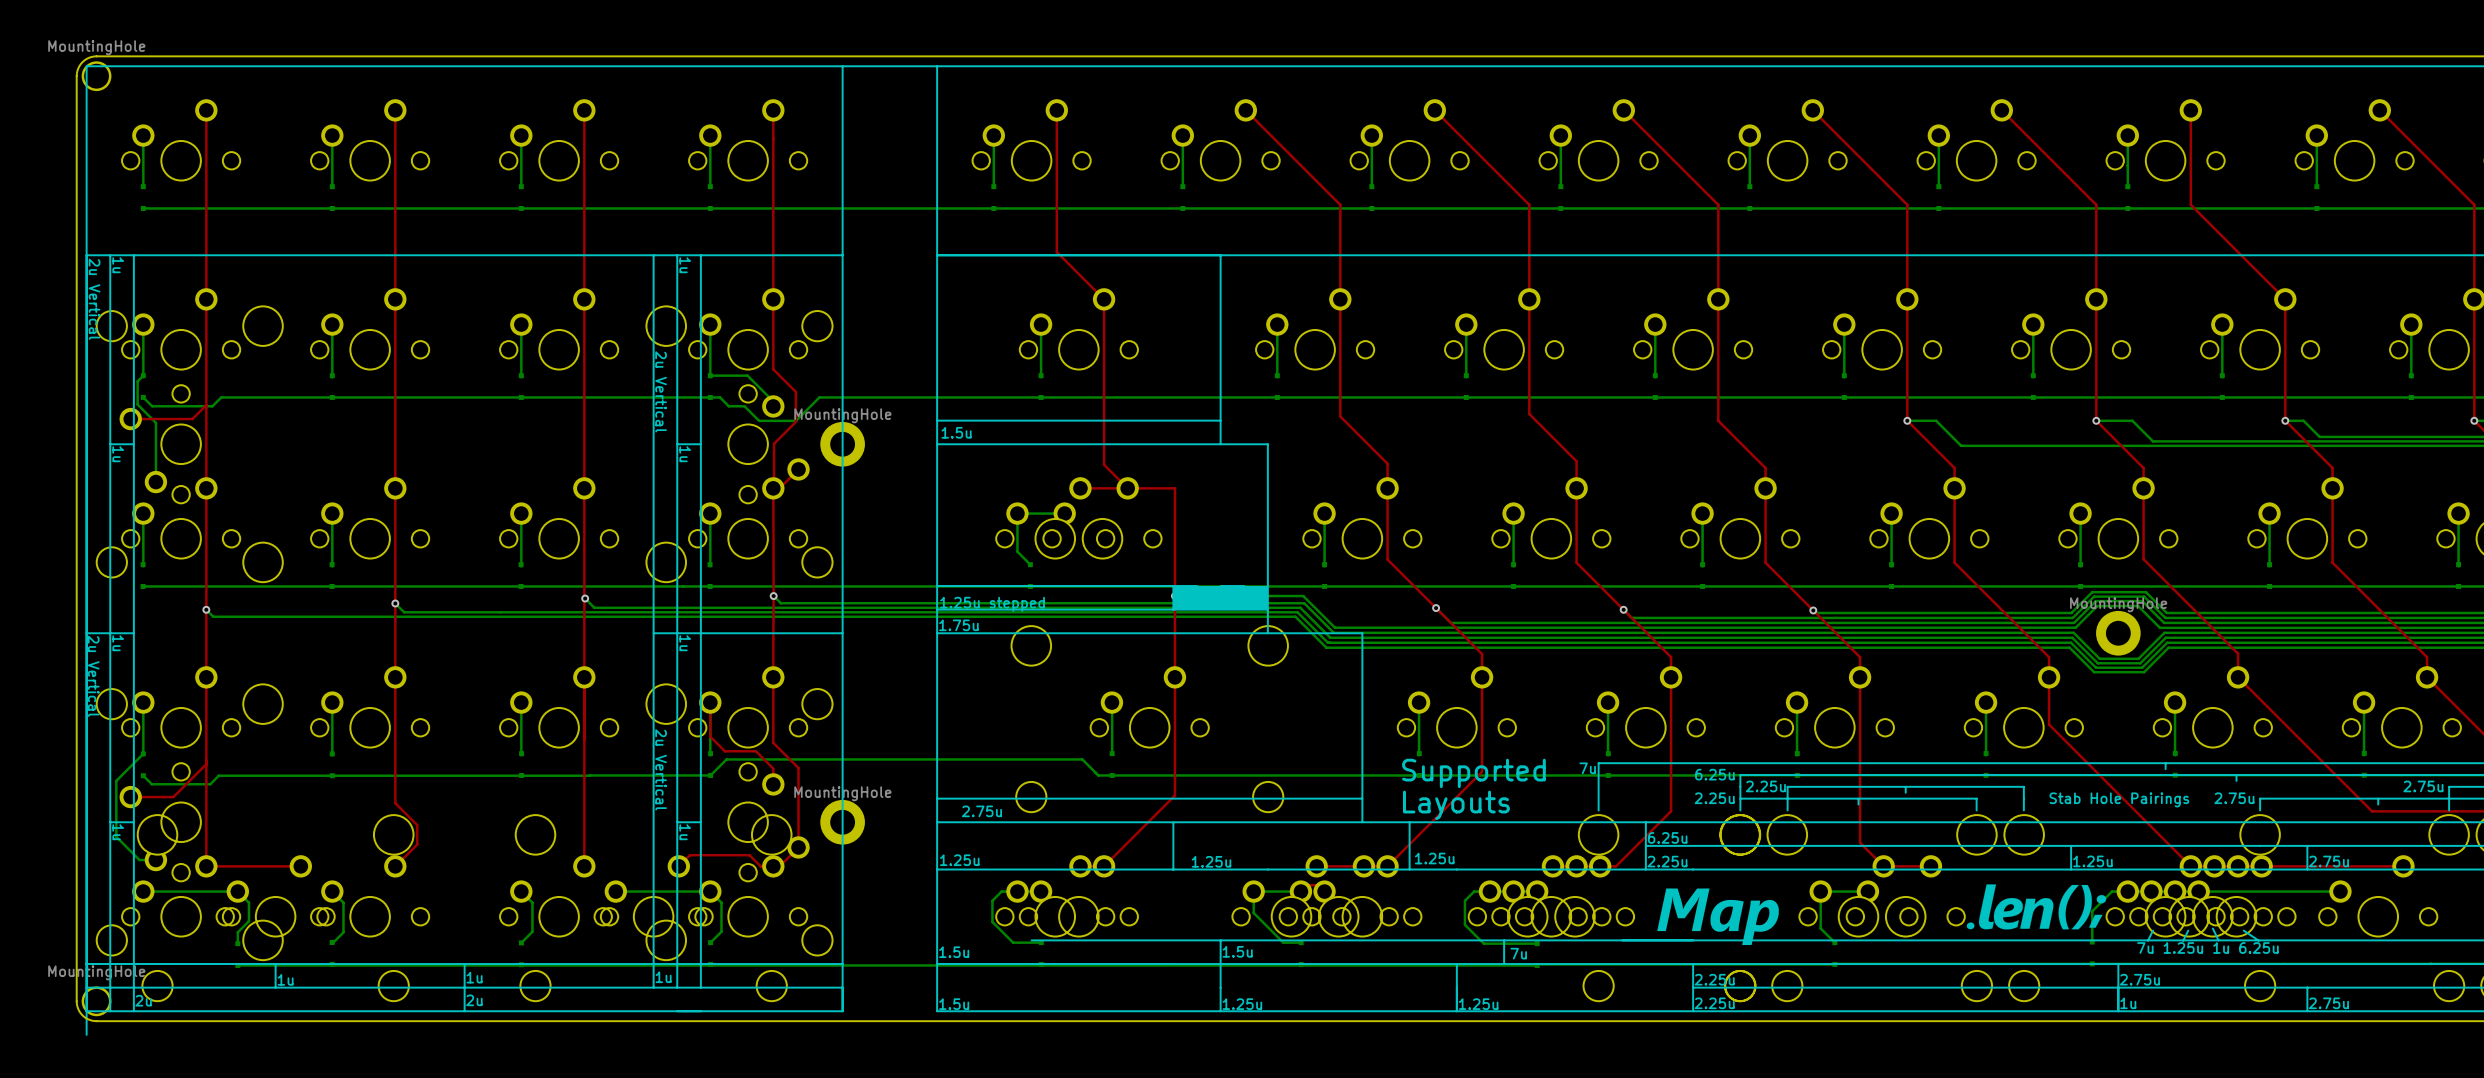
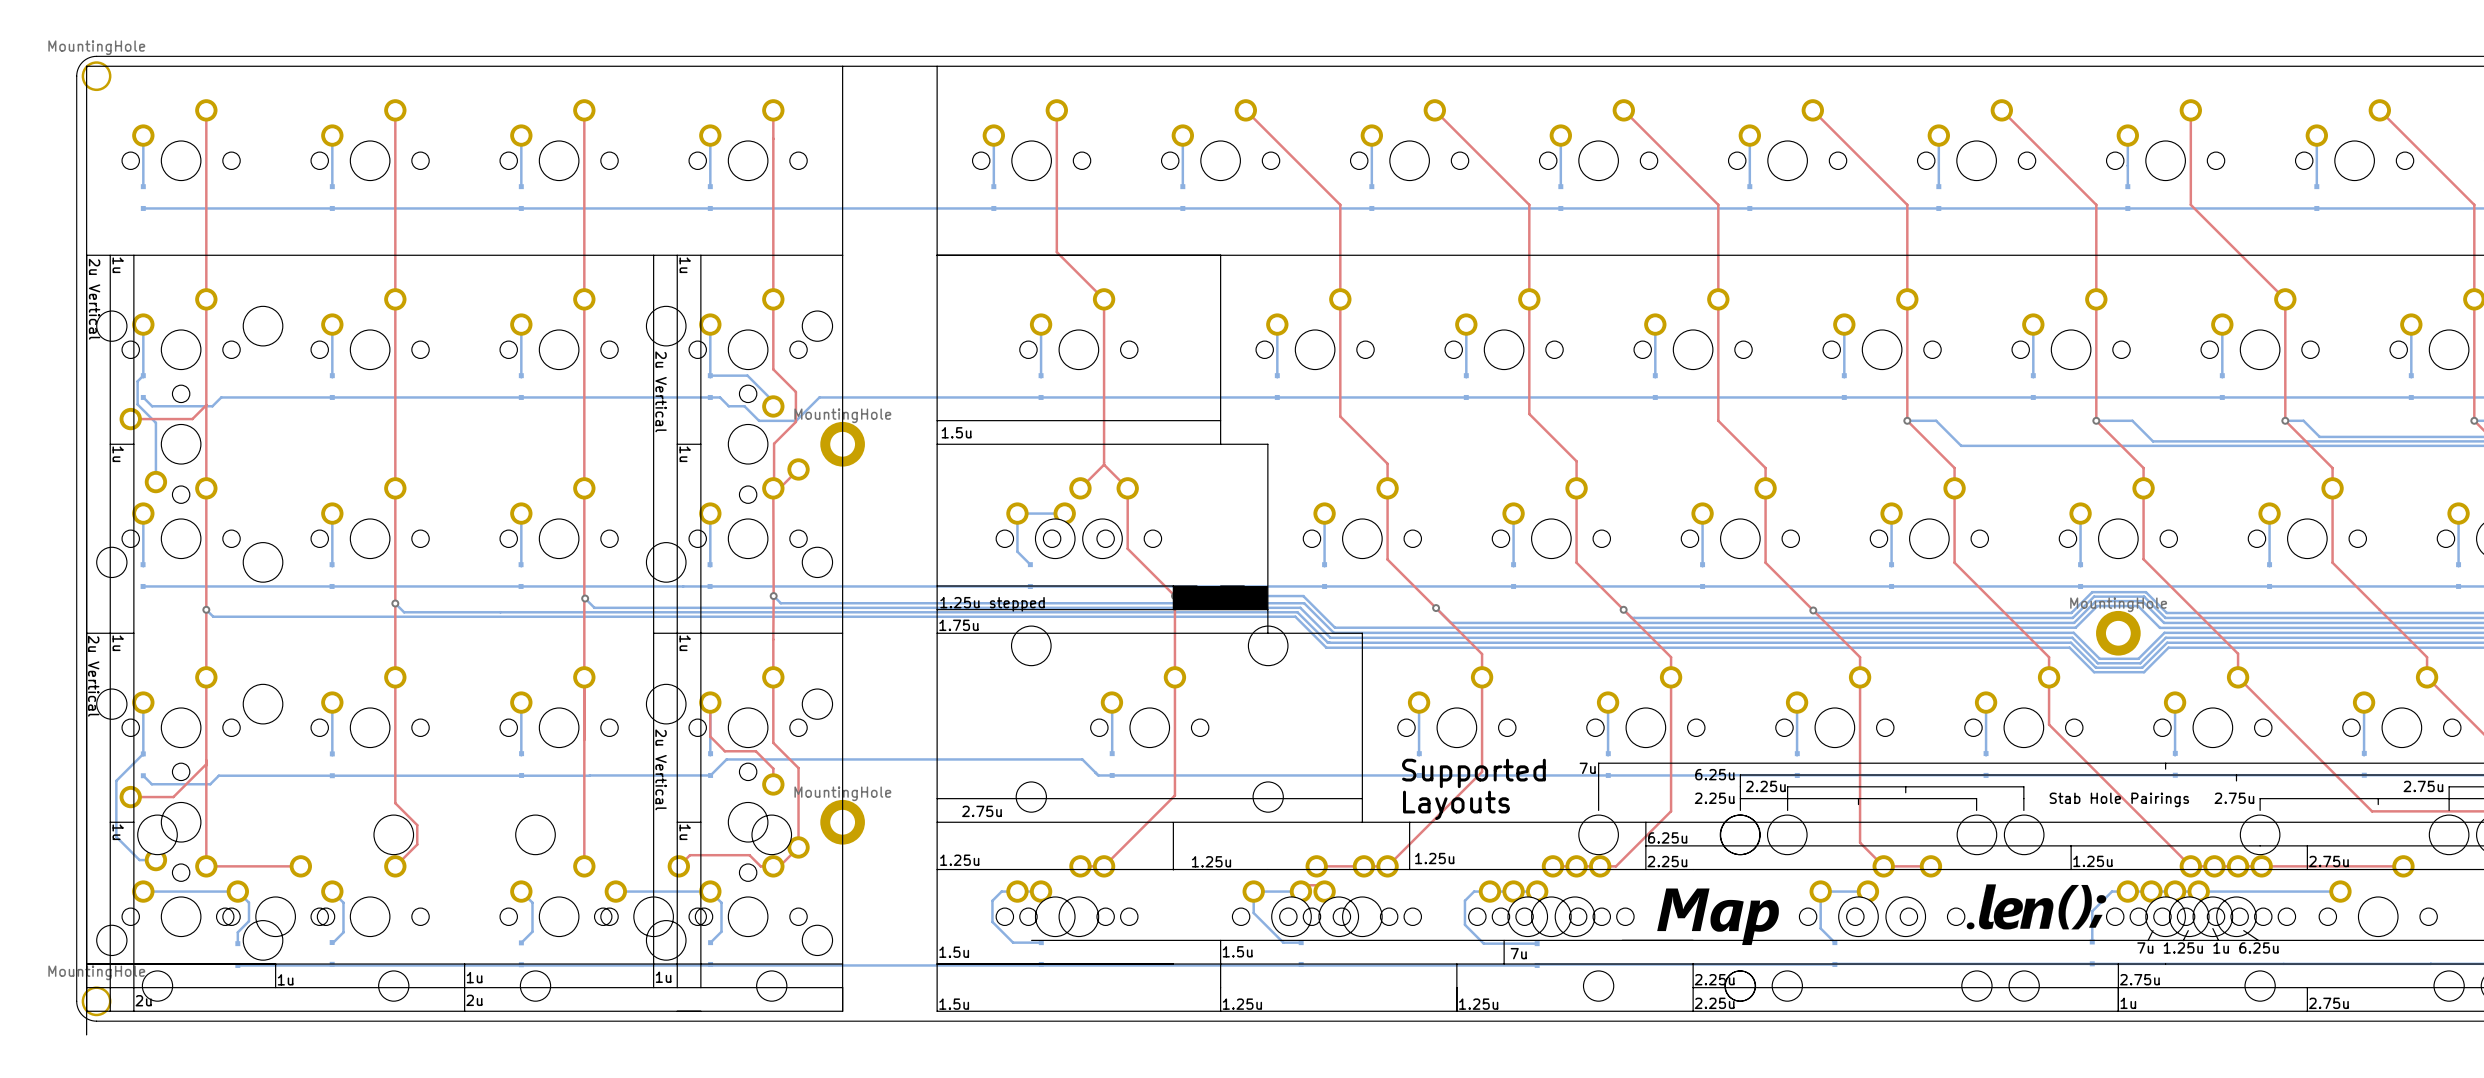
top track: none -> (1104, 464) (1080, 488)
top track: (1080, 488) (1174, 488) (1174, 596) -> (1127, 488) (1127, 548) (1174, 596)

